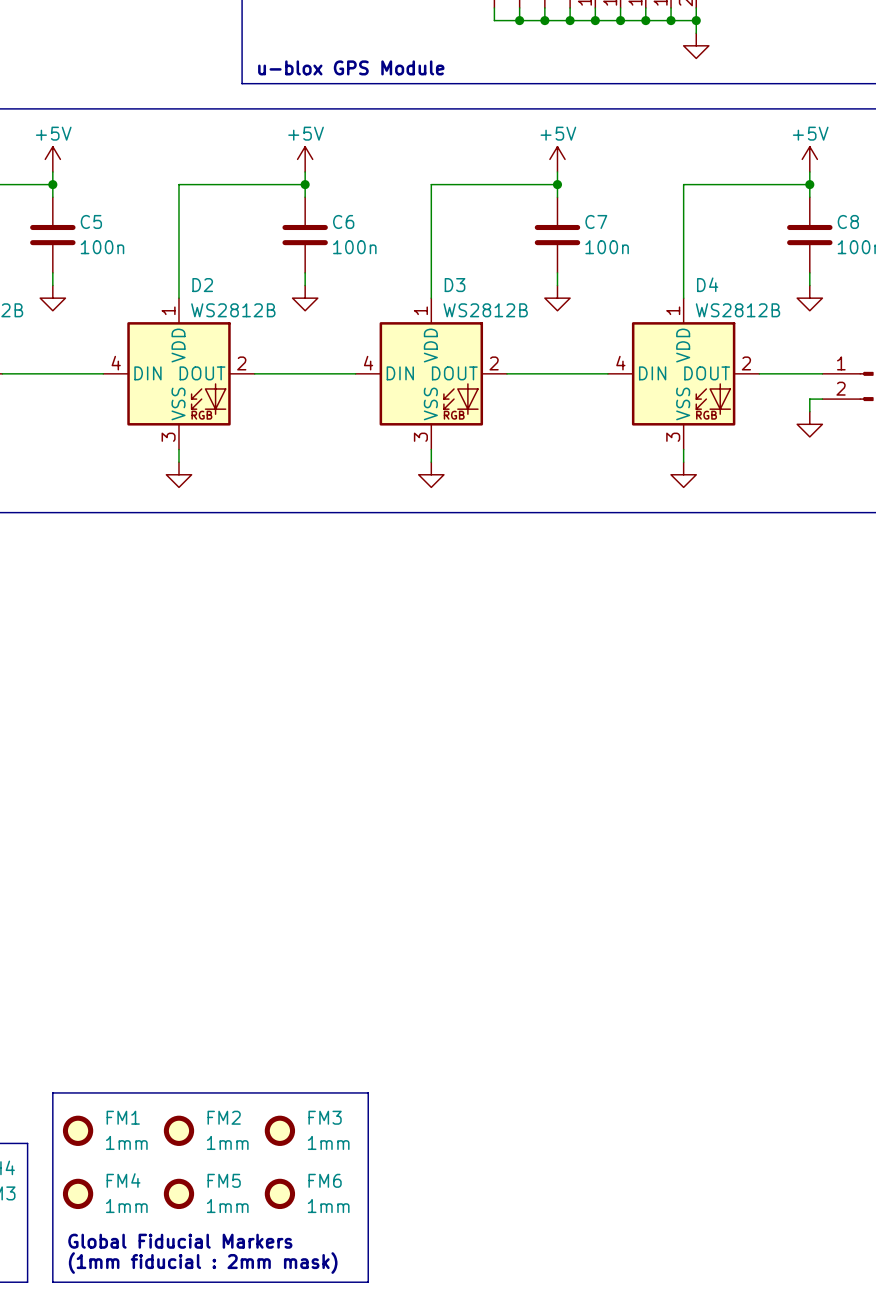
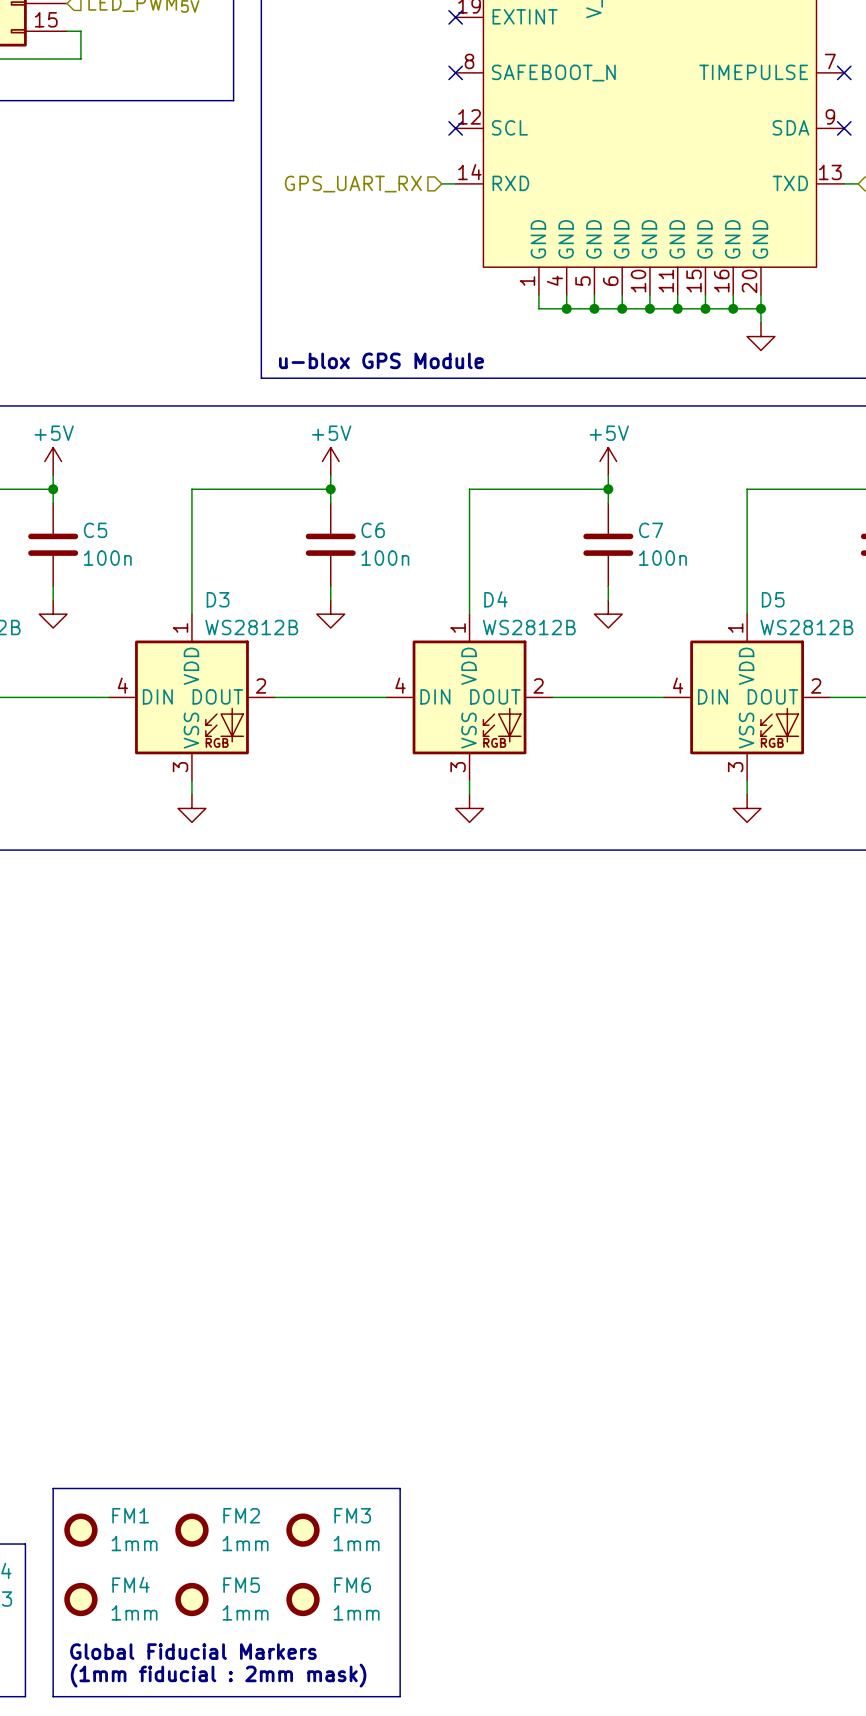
D4 name: D4 (707, 284) -> D5 (773, 599)
D2 name: D2 (202, 285) -> D3 (218, 599)
D3 name: D3 (455, 285) -> D4 (495, 599)

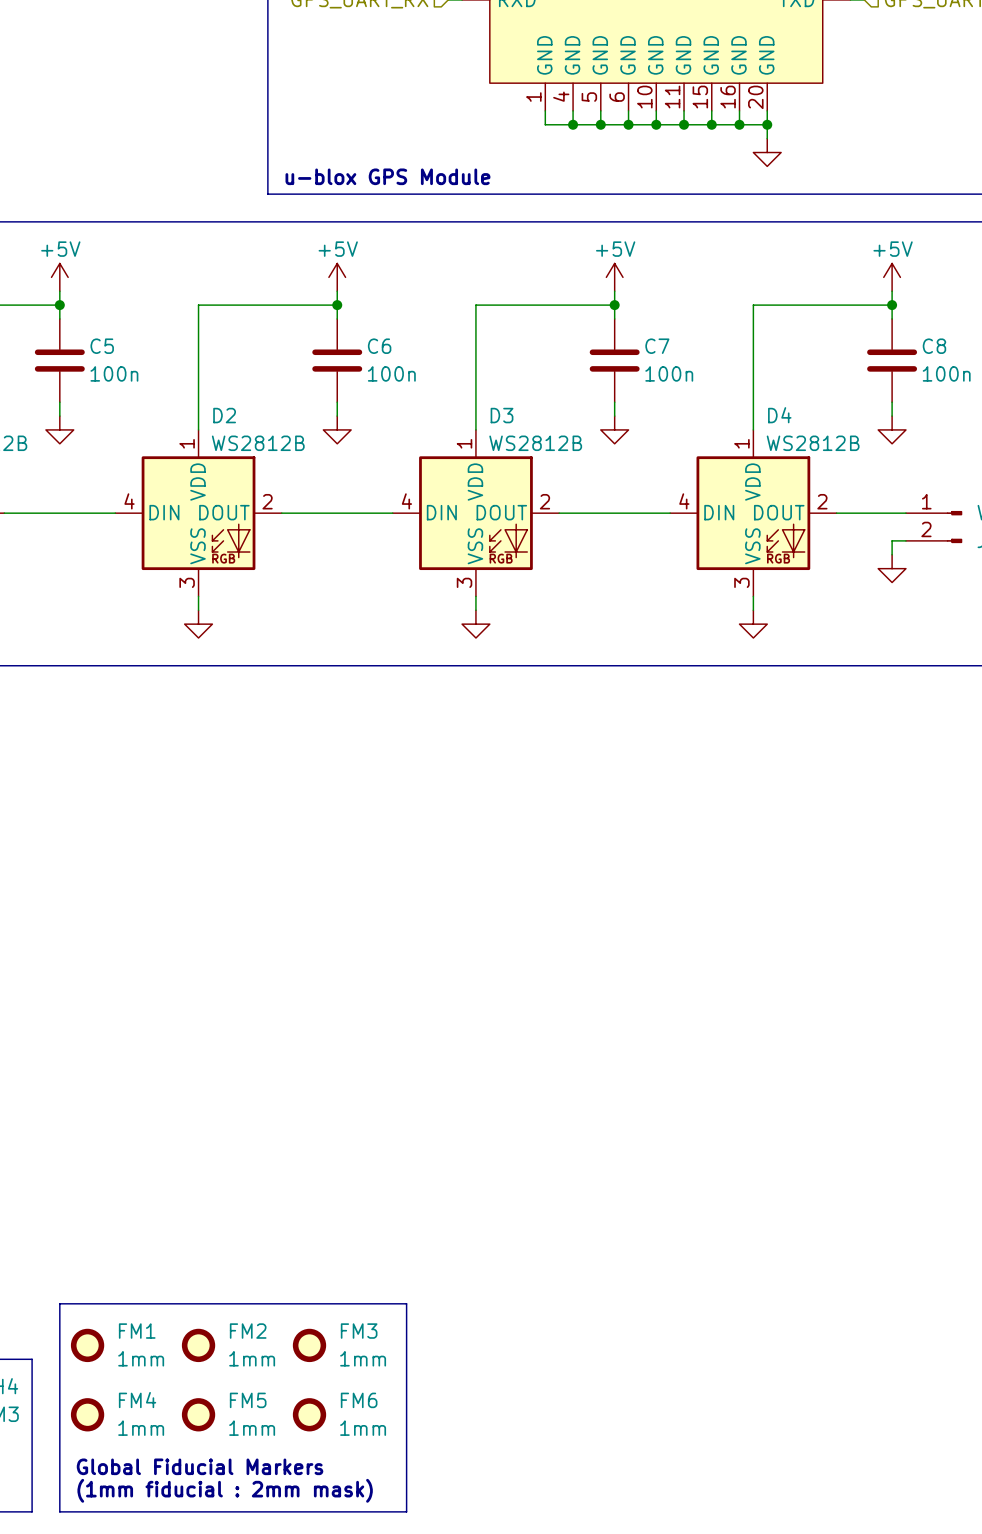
D3 name: D3 (218, 599) -> D2 (224, 415)
D4 name: D4 (495, 599) -> D3 (502, 415)
D5 name: D5 (773, 599) -> D4 (779, 415)

